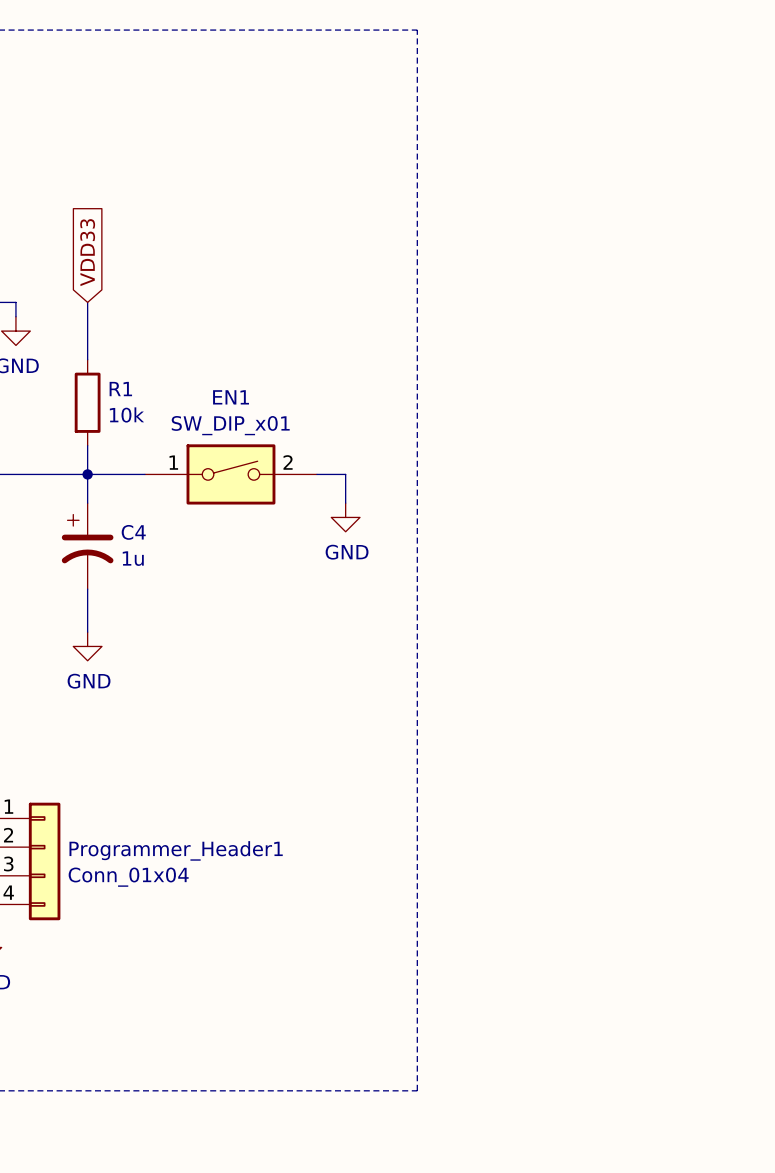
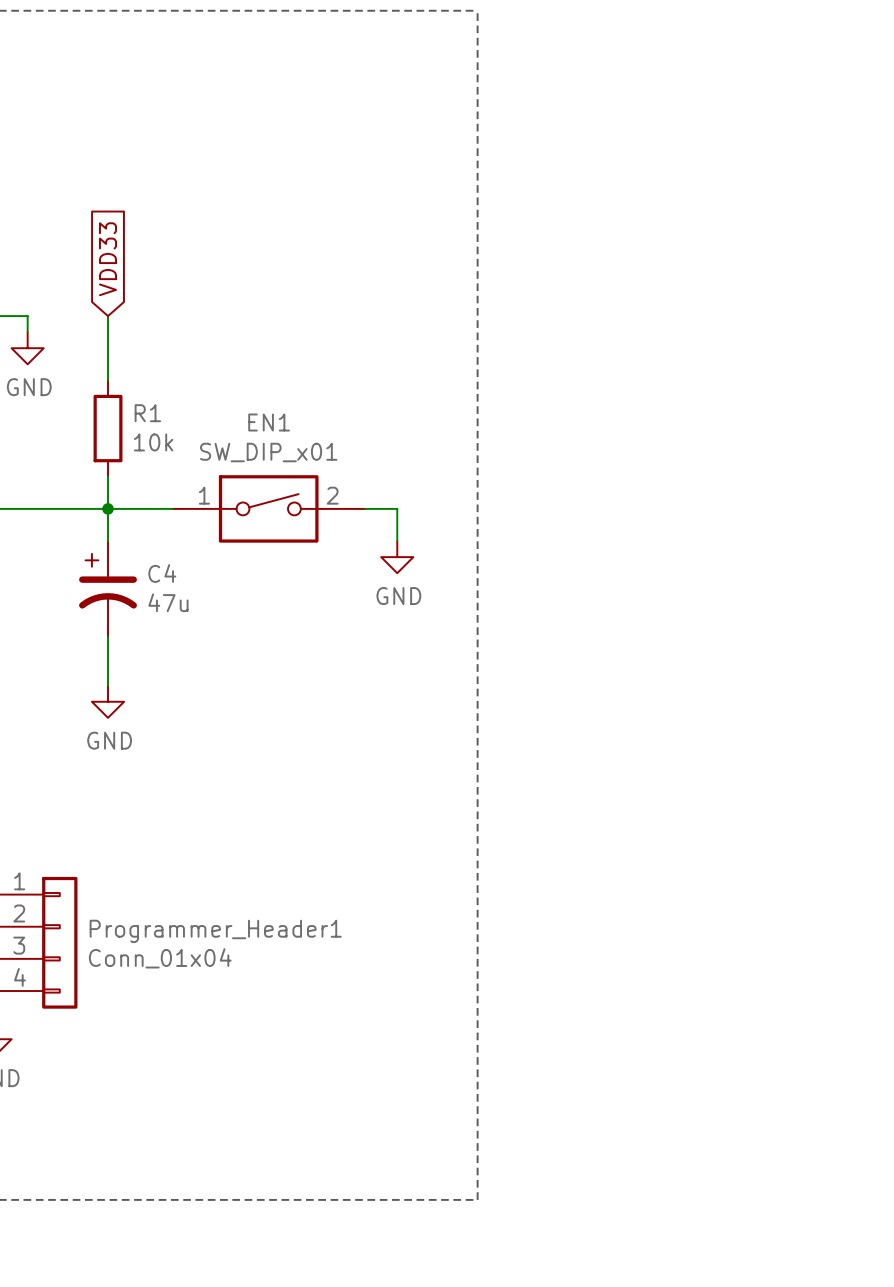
C4 value: 1u (133, 558) -> 47u (168, 602)

